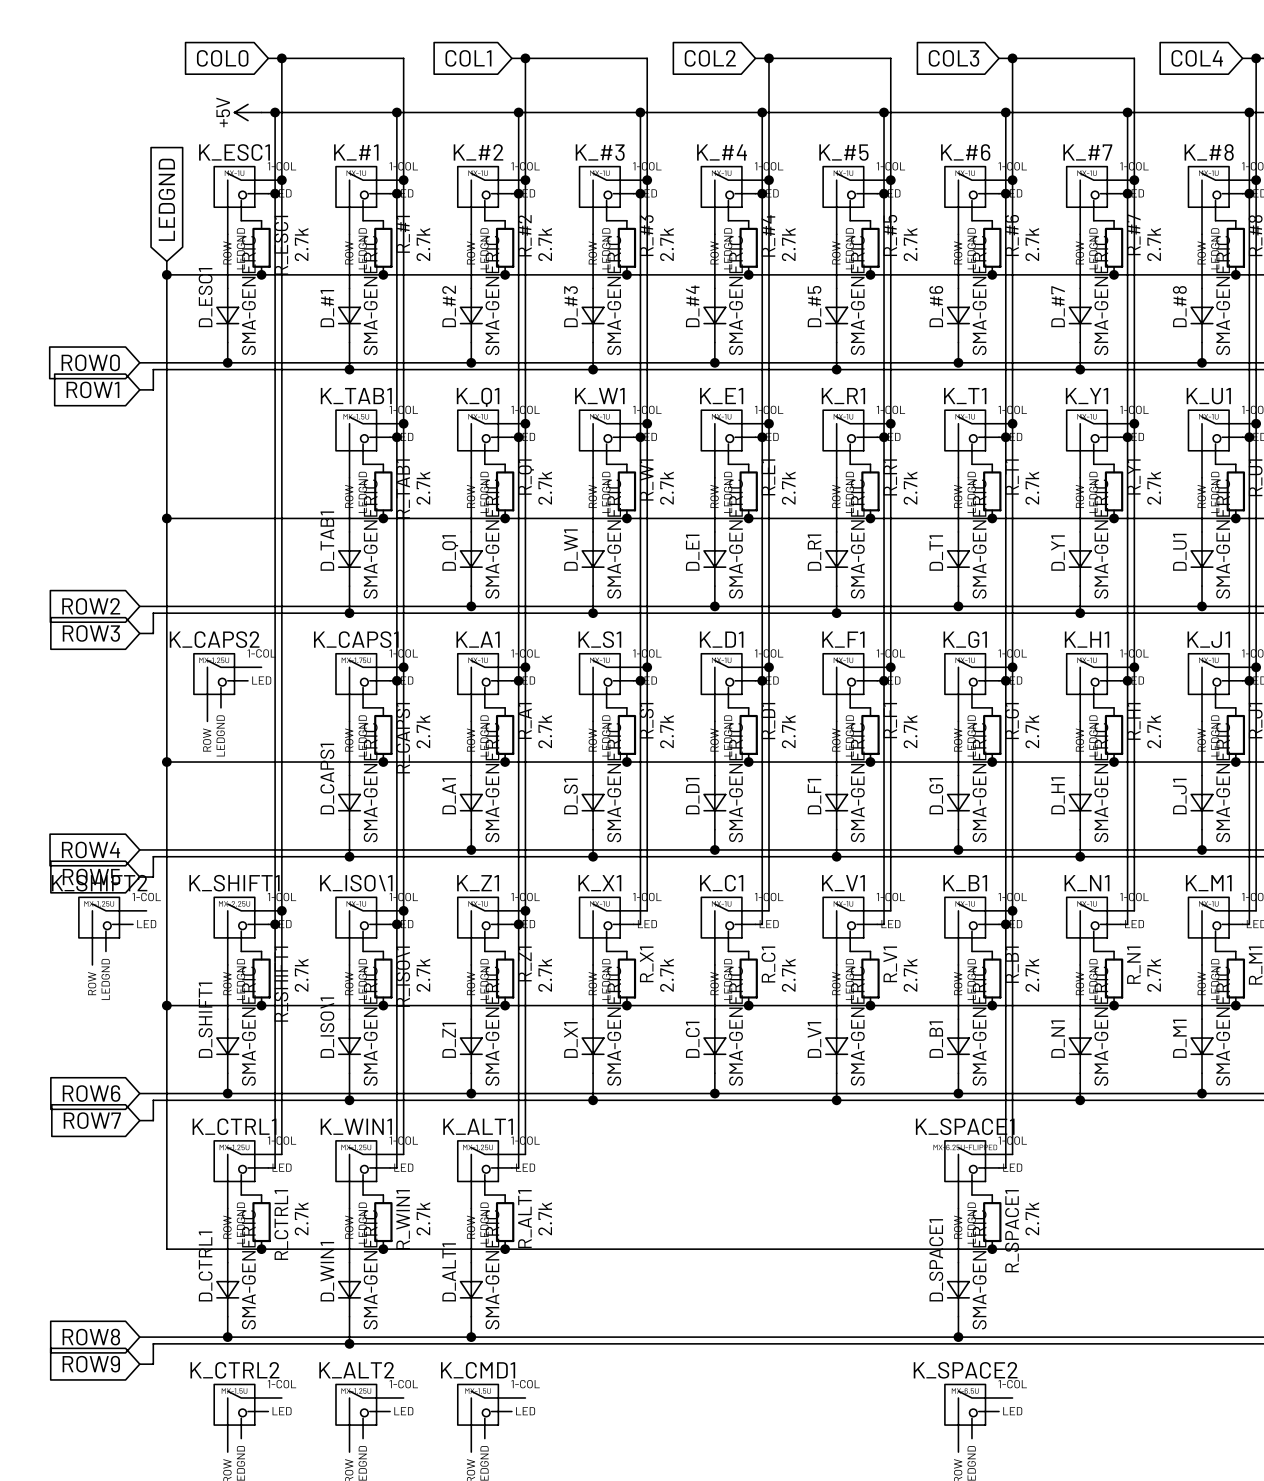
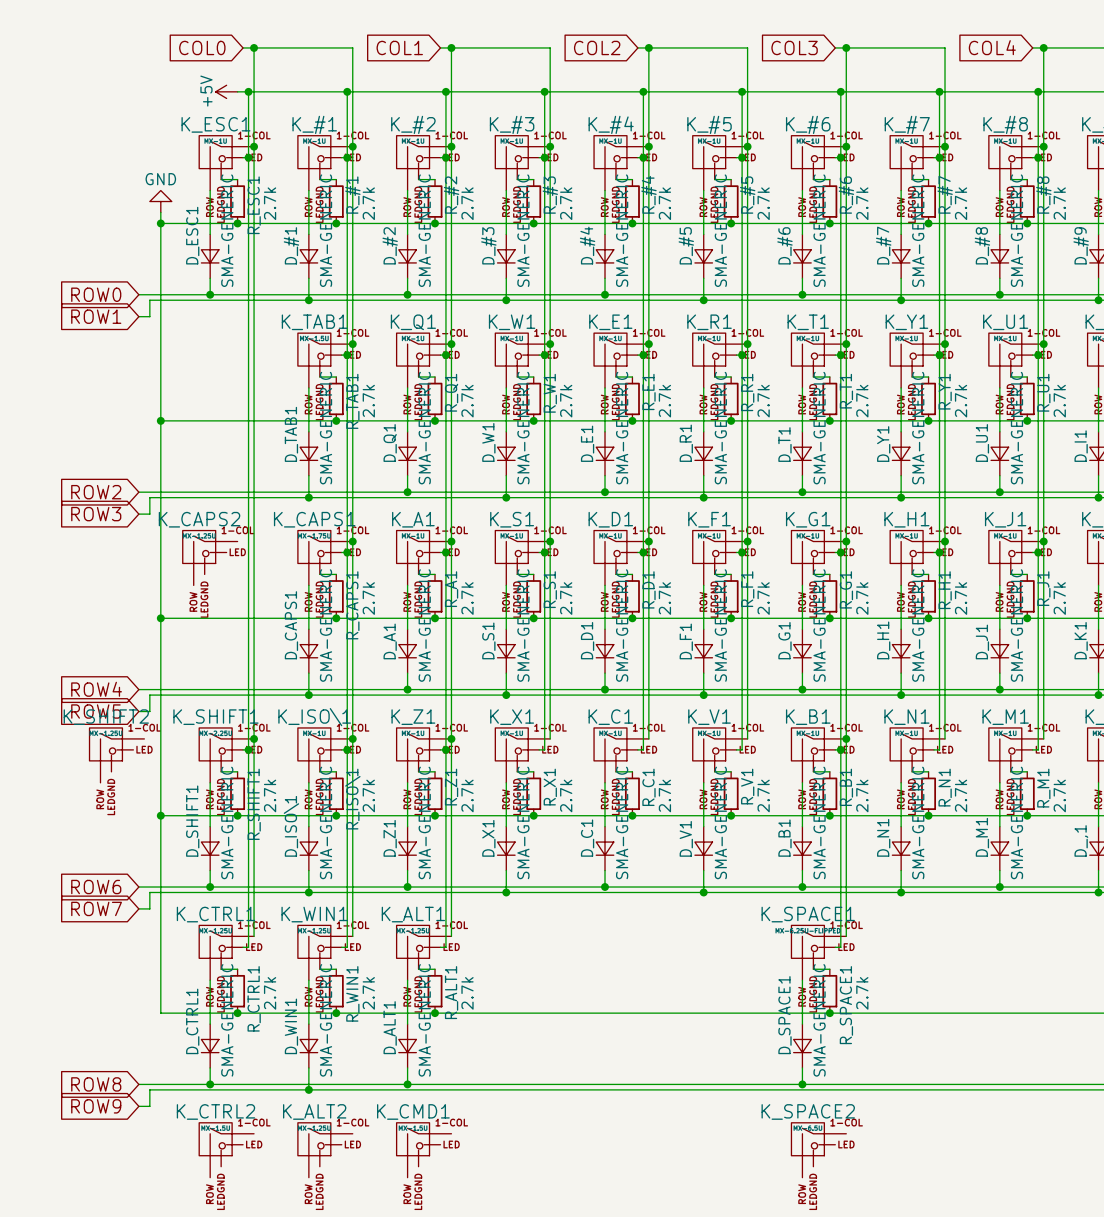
global label: LEDGND (166, 199) -> none
power symbol: none -> GND (160, 201)

